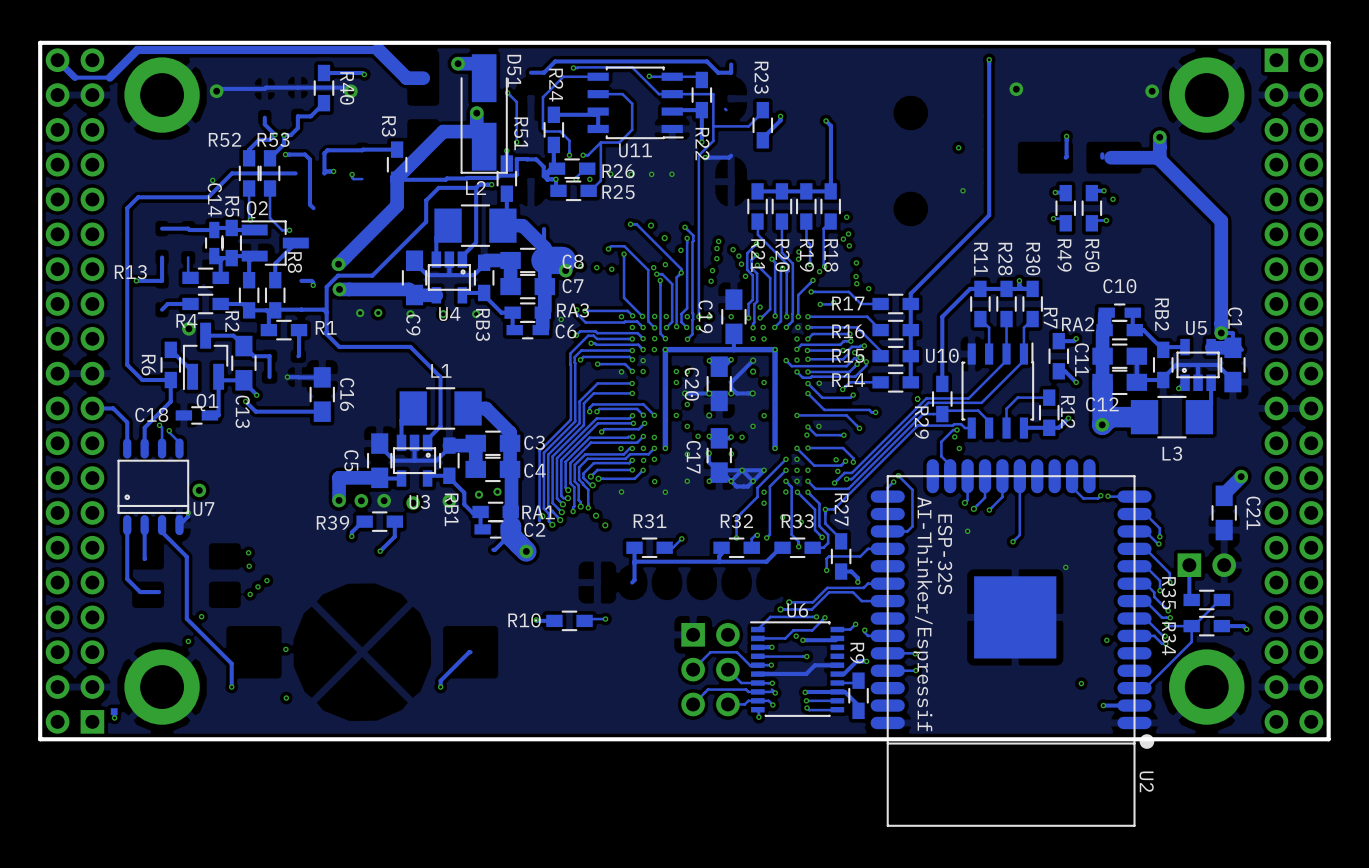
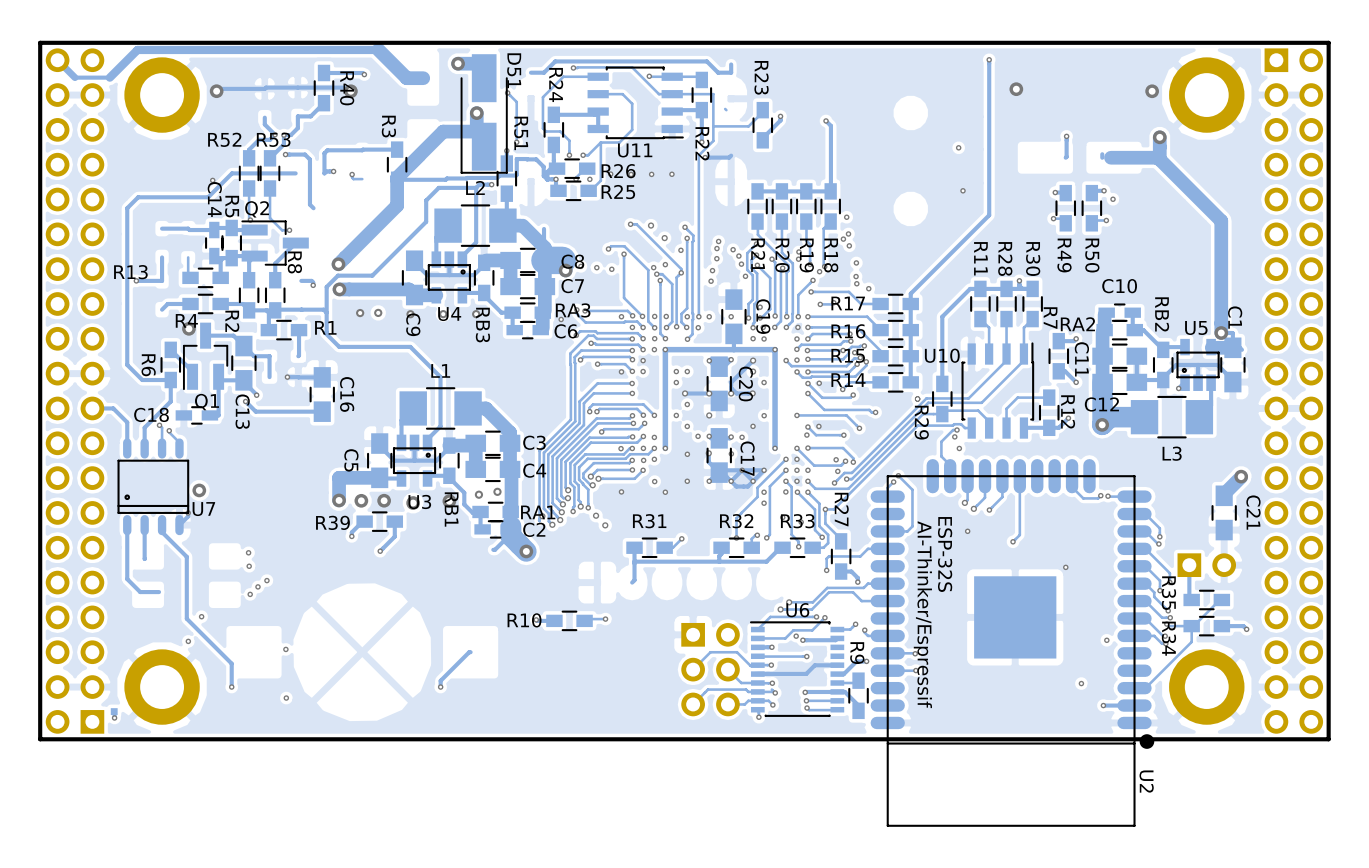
C19 name position: C19 (705, 316) -> C19 (763, 316)
C20 name position: C20 (691, 384) -> C20 (745, 383)
C17 name position: C17 (693, 457) -> C17 (747, 458)

